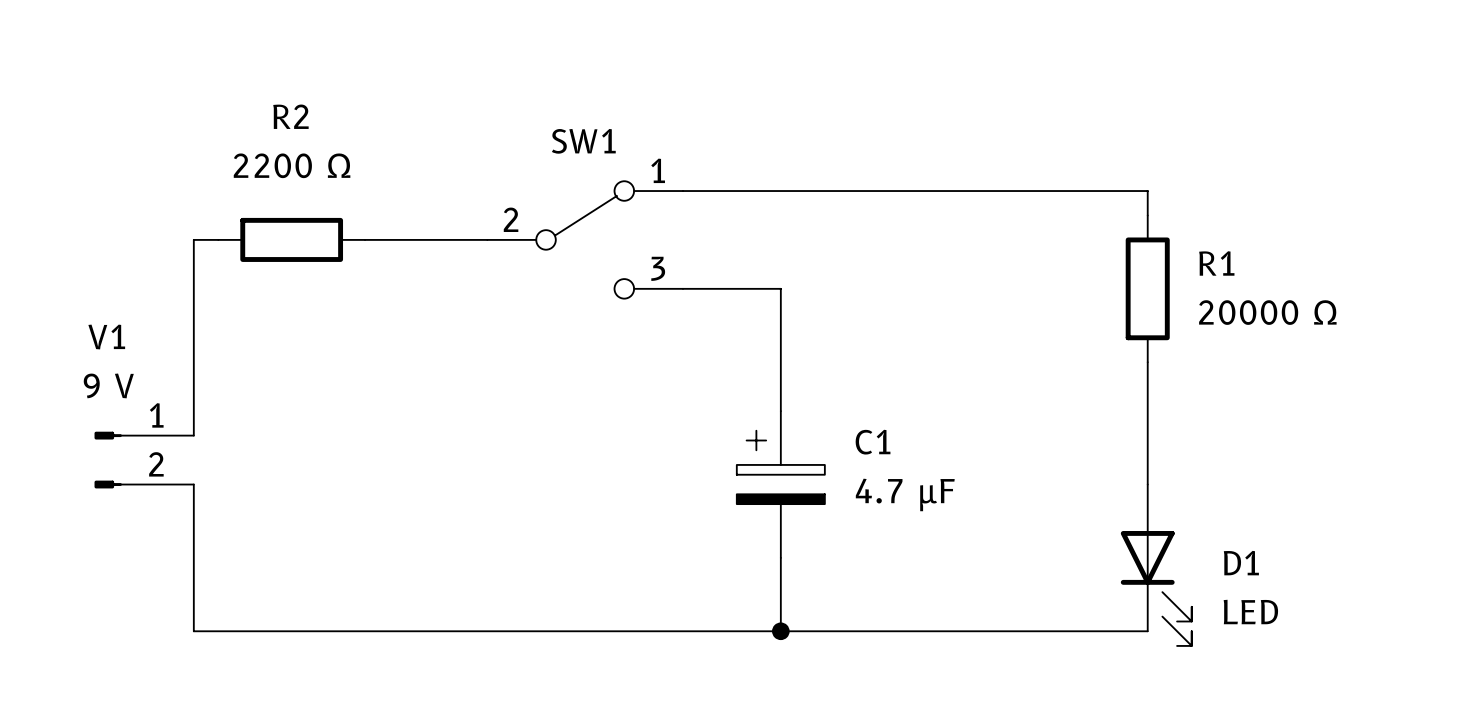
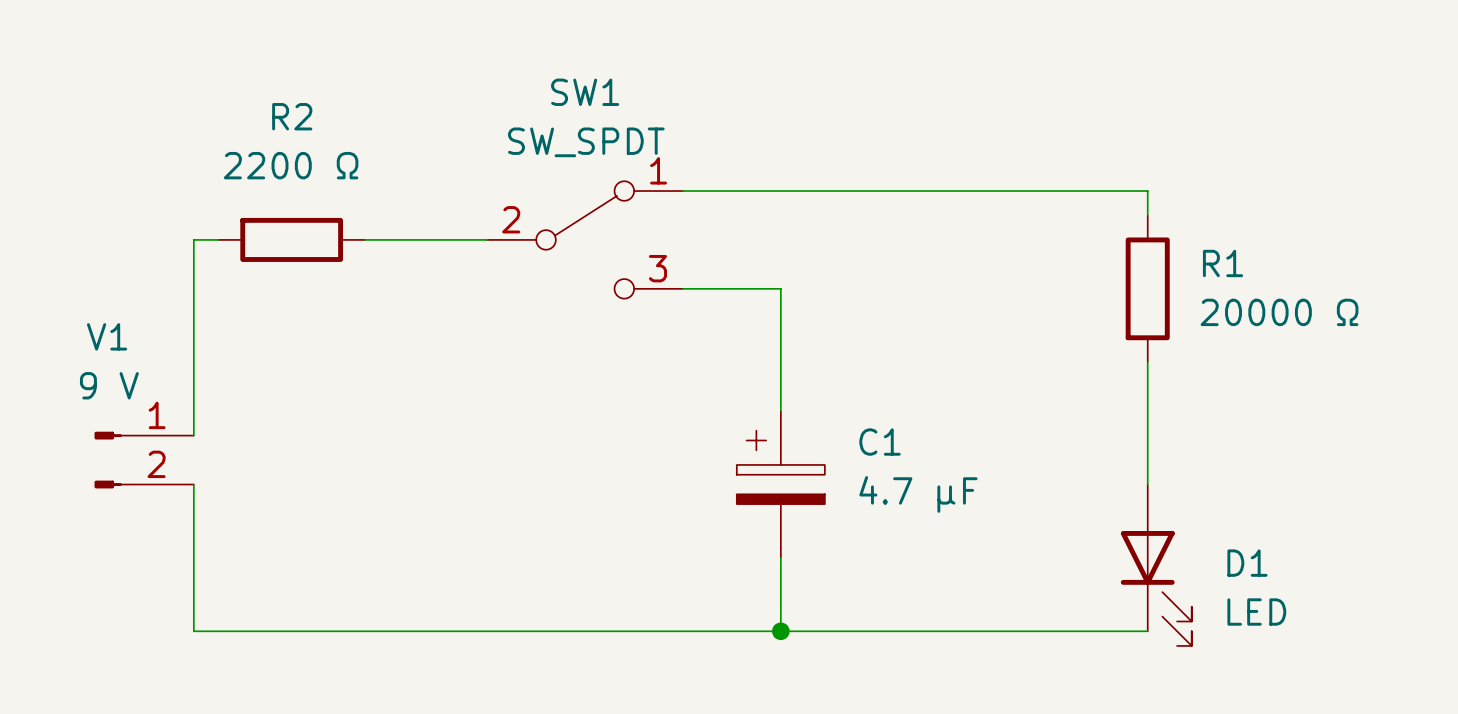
SW1 name position: SW1 (583, 141) -> SW1 (585, 92)
SW1 value: none -> SW_SPDT (586, 142)

